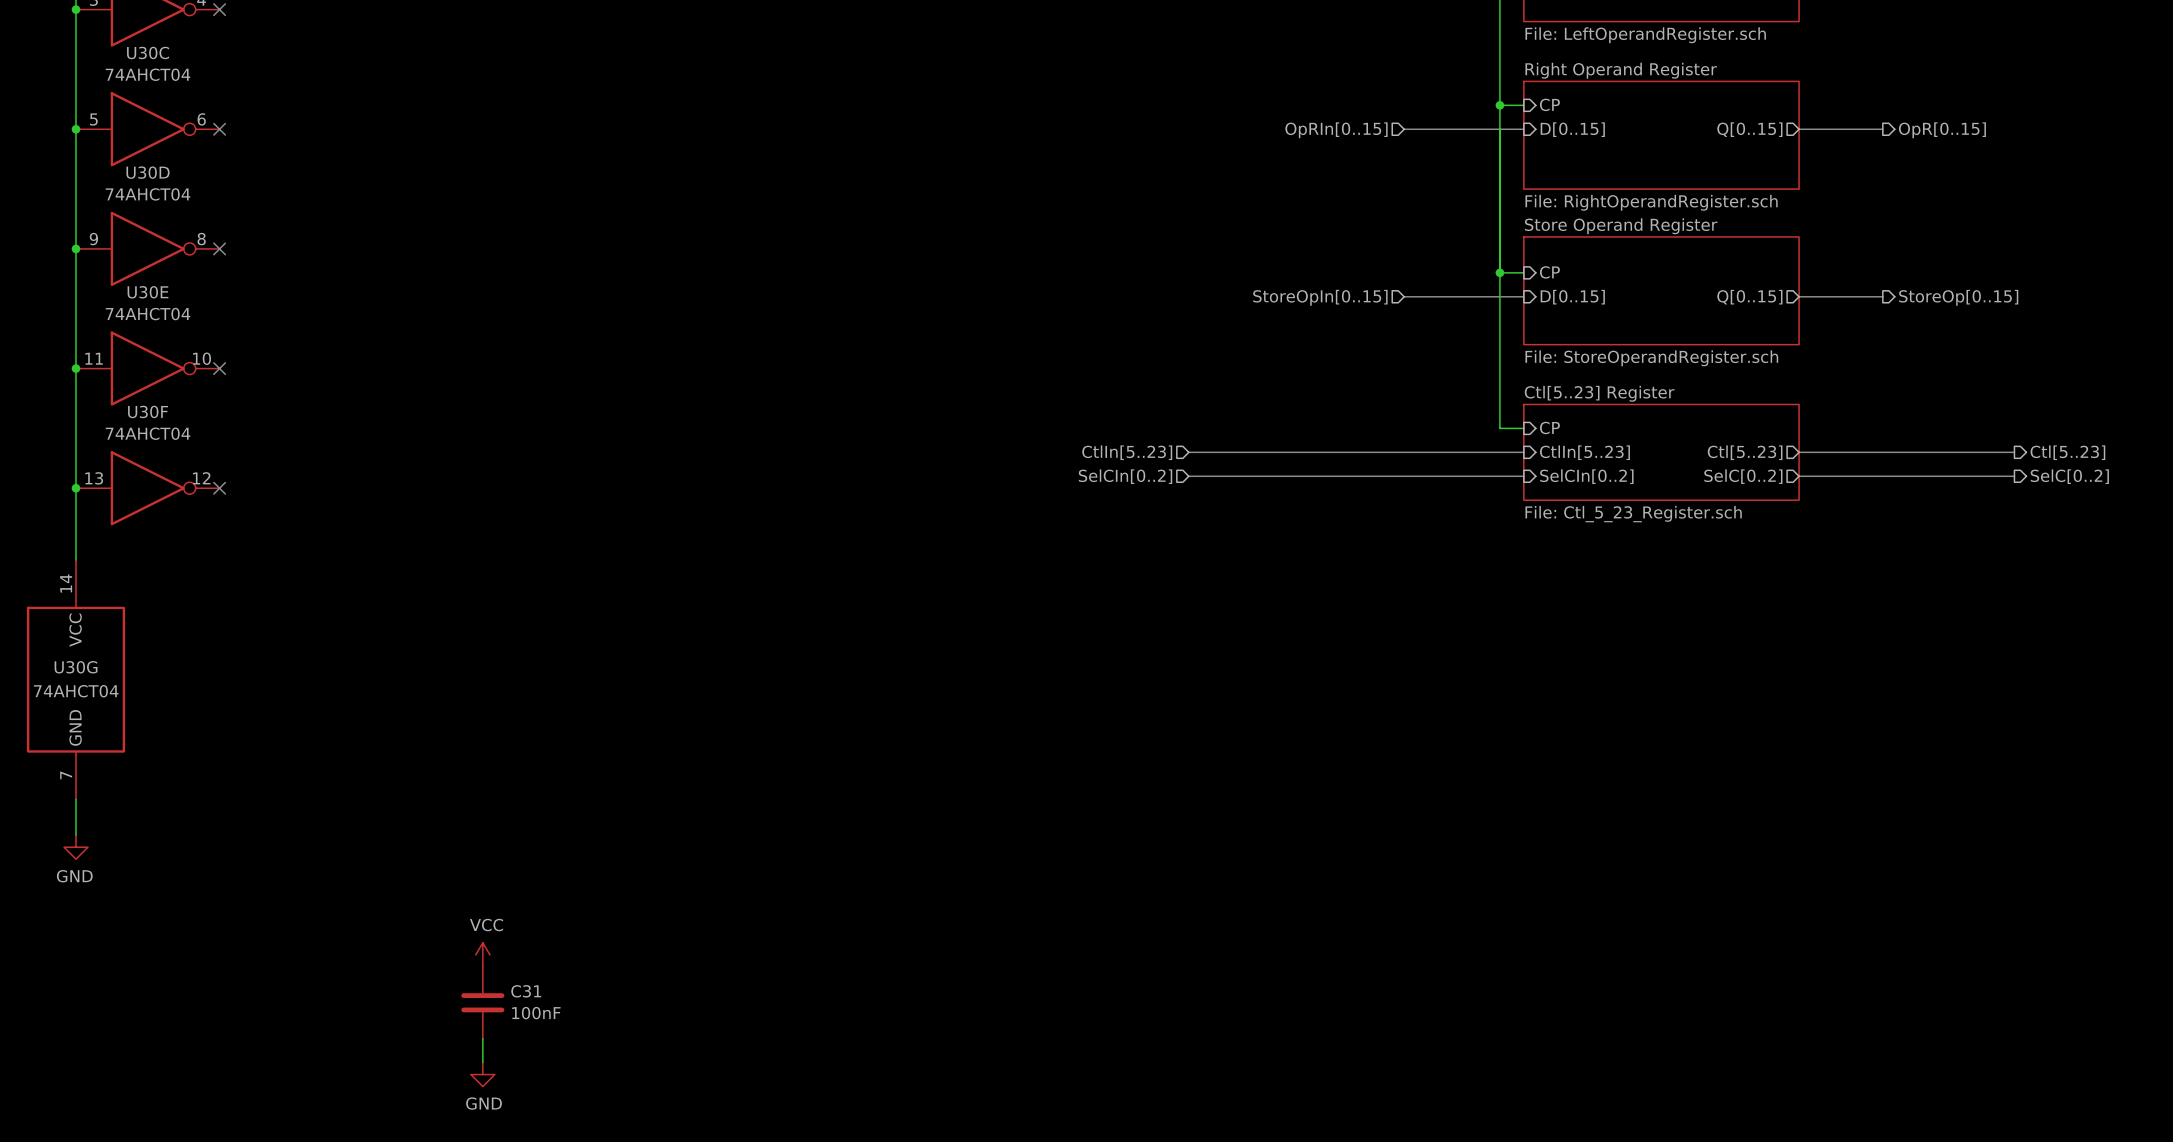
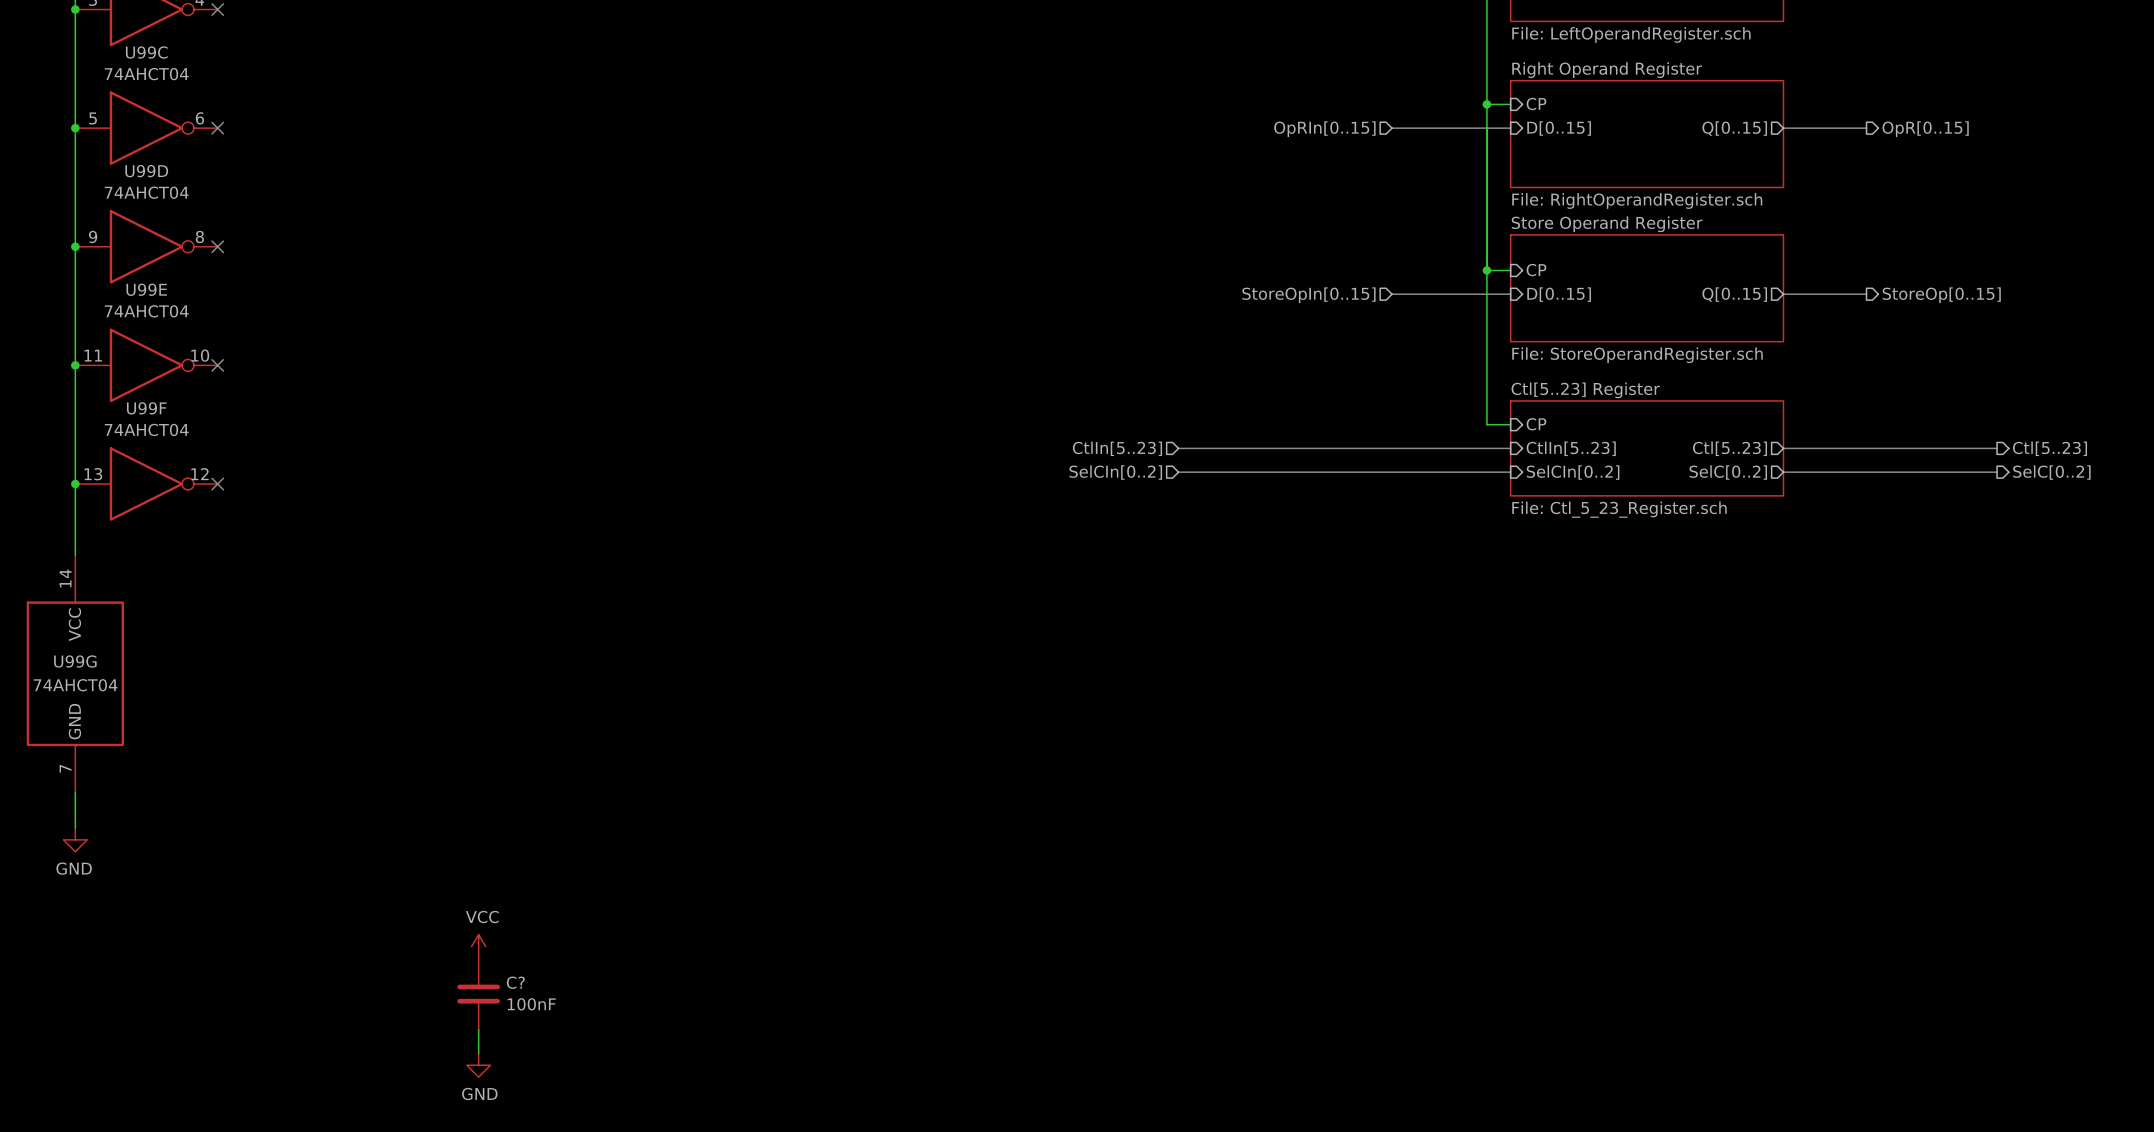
U30C name: U30C (148, 52) -> U99C (146, 52)
U30D name: U30D (148, 172) -> U99D (146, 171)
U30E name: U30E (147, 292) -> U99E (146, 289)
U30F name: U30F (148, 411) -> U99F (146, 408)
U30G name: U30G (76, 667) -> U99G (75, 661)
C31 name: C31 (526, 991) -> C? (515, 982)

